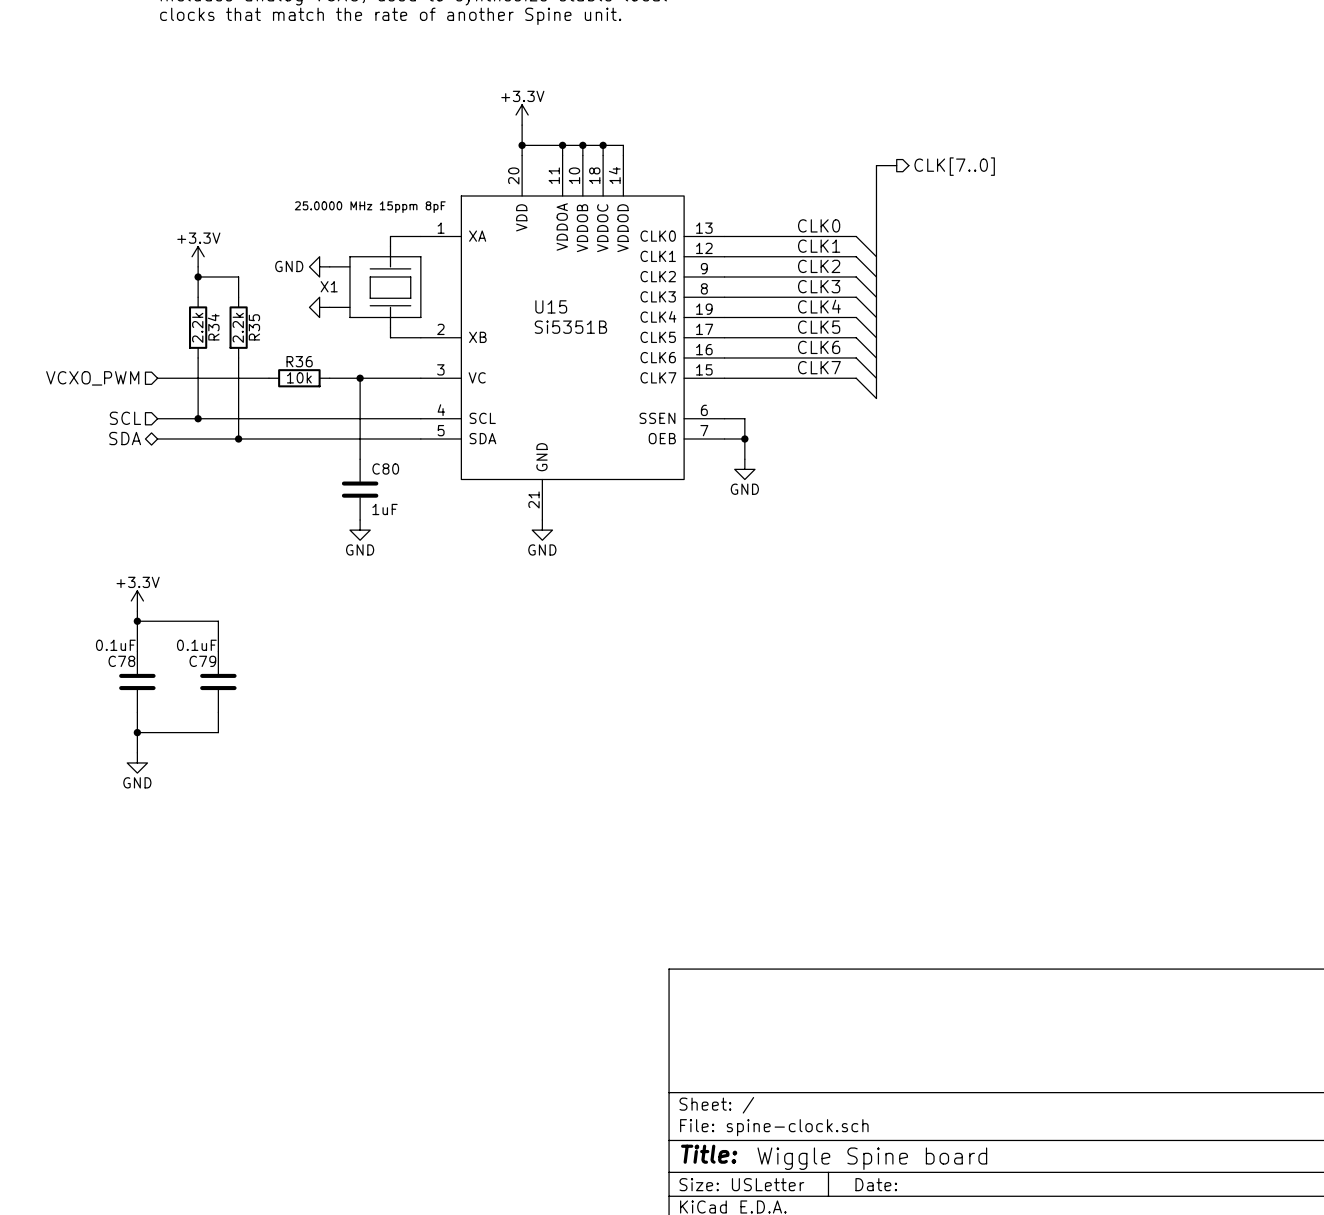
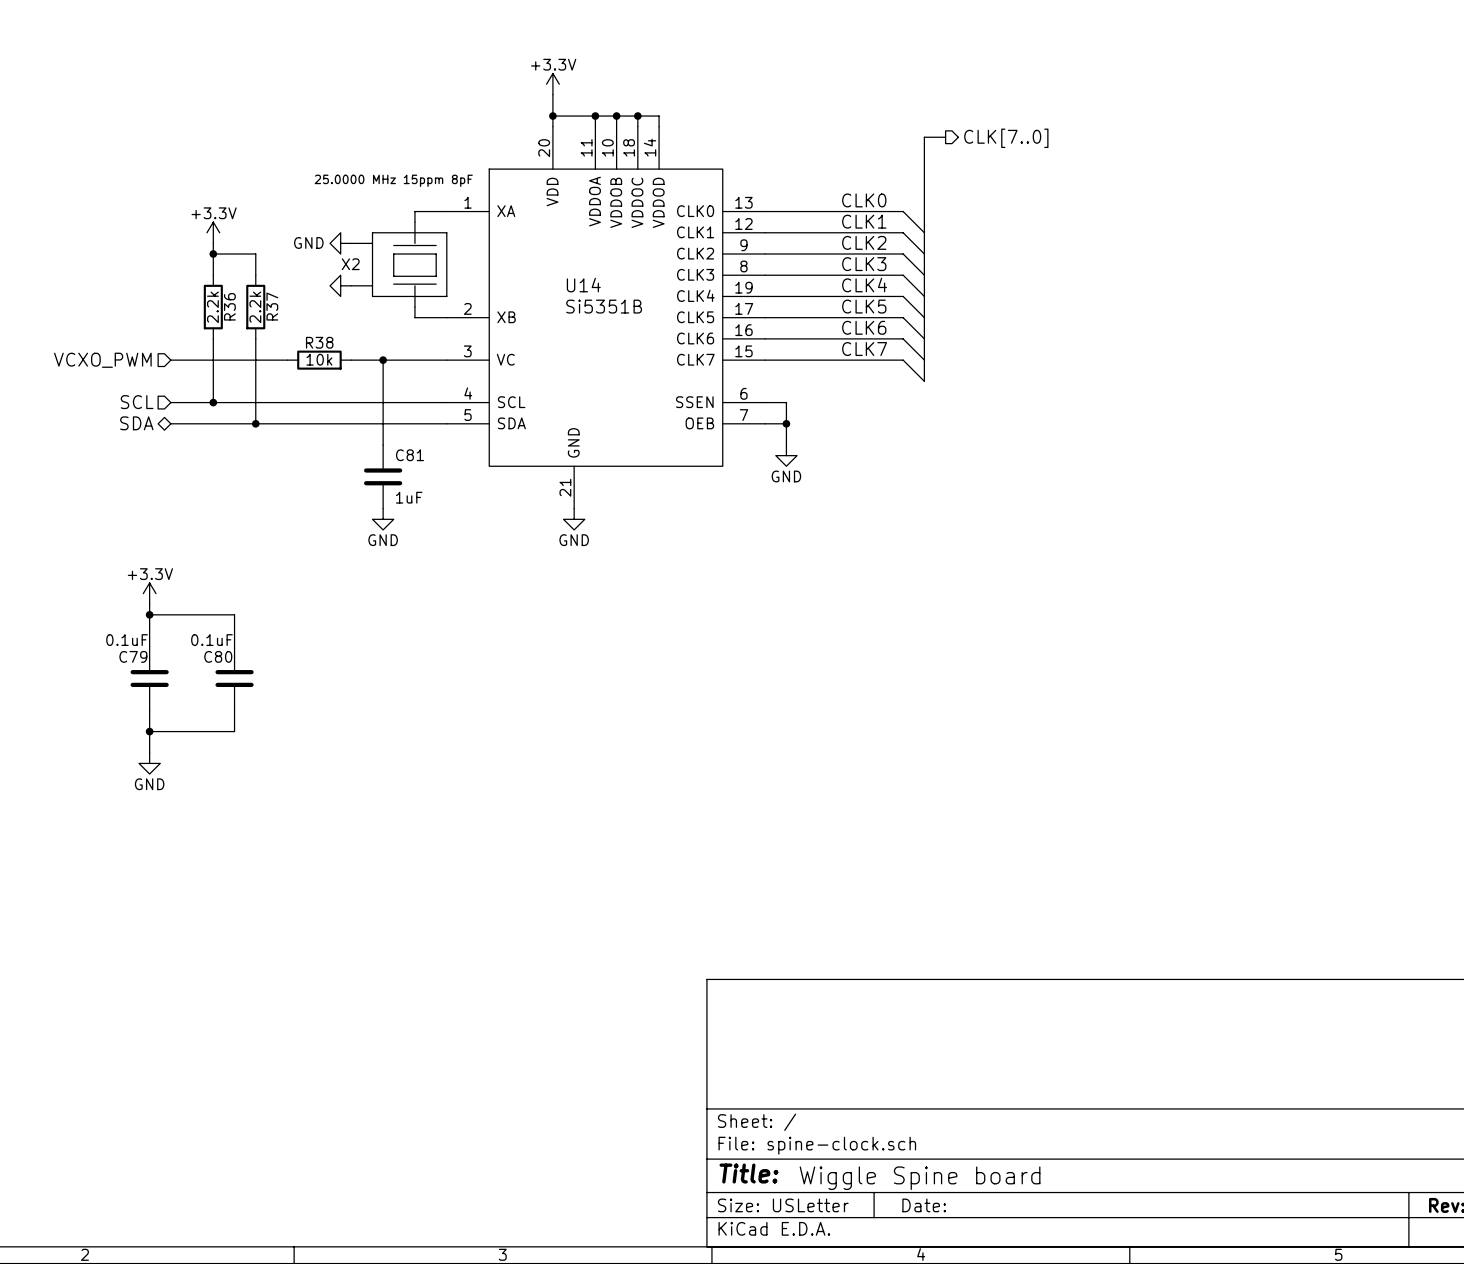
X1 name: X1 (329, 286) -> X2 (350, 264)
U15 name: U15 (551, 306) -> U14 (583, 285)
R34 name: R34 (213, 327) -> R36 (229, 306)
R35 name: R35 (254, 327) -> R37 (272, 306)
R36 name: R36 (299, 361) -> R38 (319, 342)
C80 name: C80 (385, 468) -> C81 (409, 455)
C78 name: C78 (121, 661) -> C79 (133, 656)
C79 name: C79 (202, 661) -> C80 (218, 656)

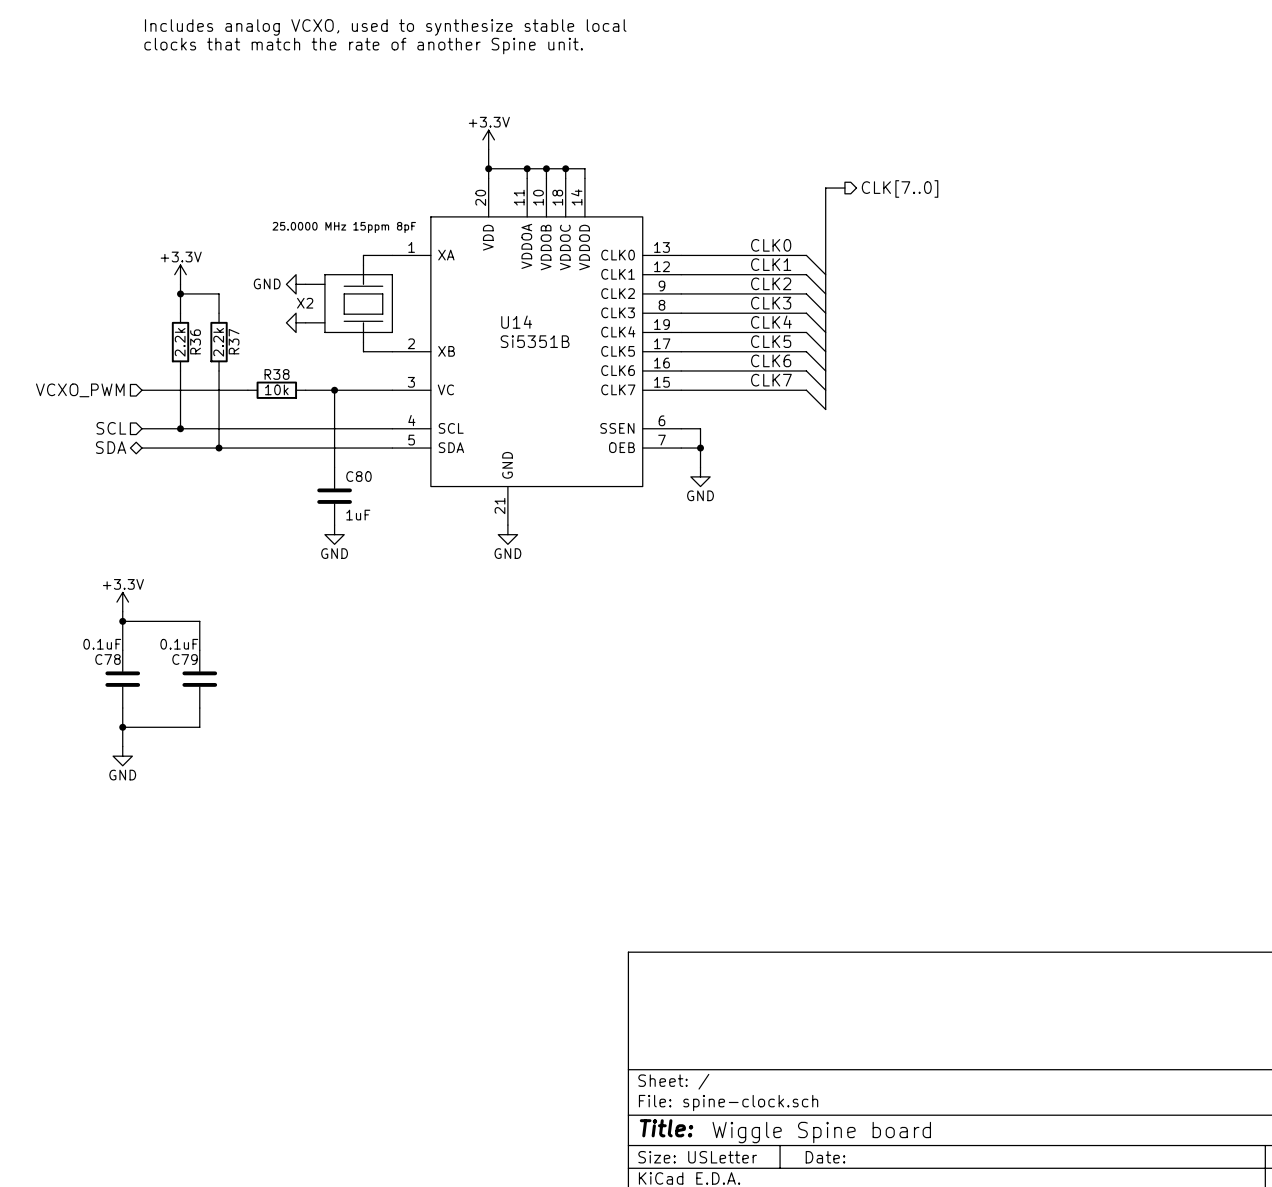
C81 name: C81 (409, 455) -> C80 (358, 476)
C79 name: C79 (133, 656) -> C78 (107, 659)
C80 name: C80 (218, 656) -> C79 (185, 659)

